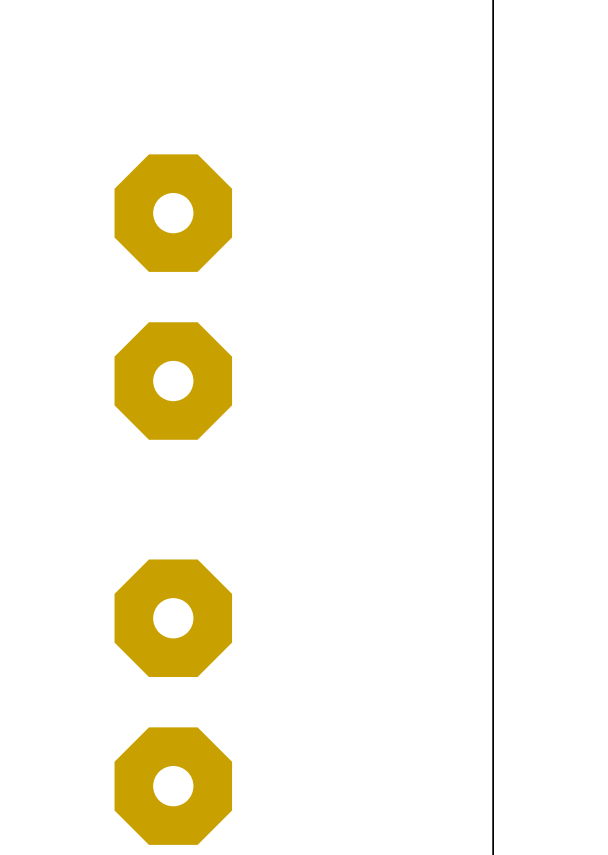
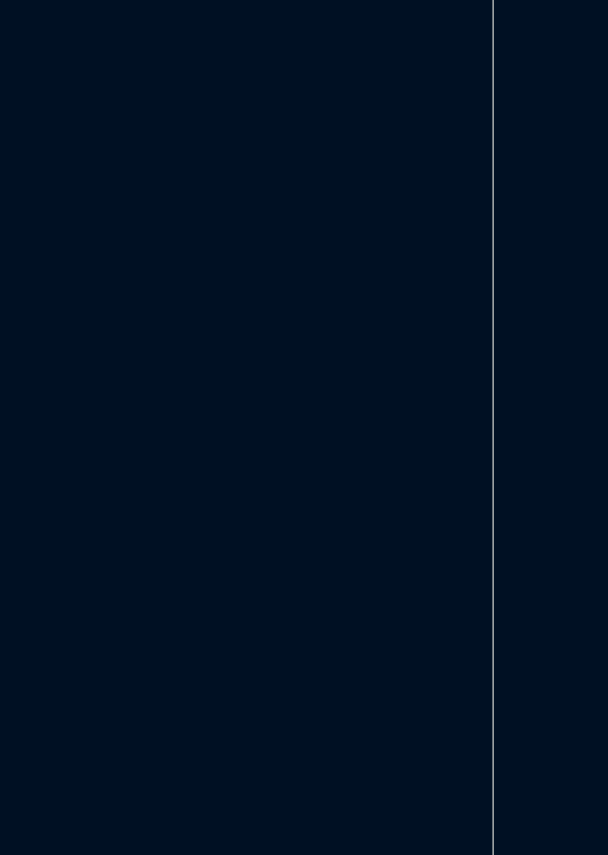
part: (173, 297) -> none
part: (173, 702) -> none

